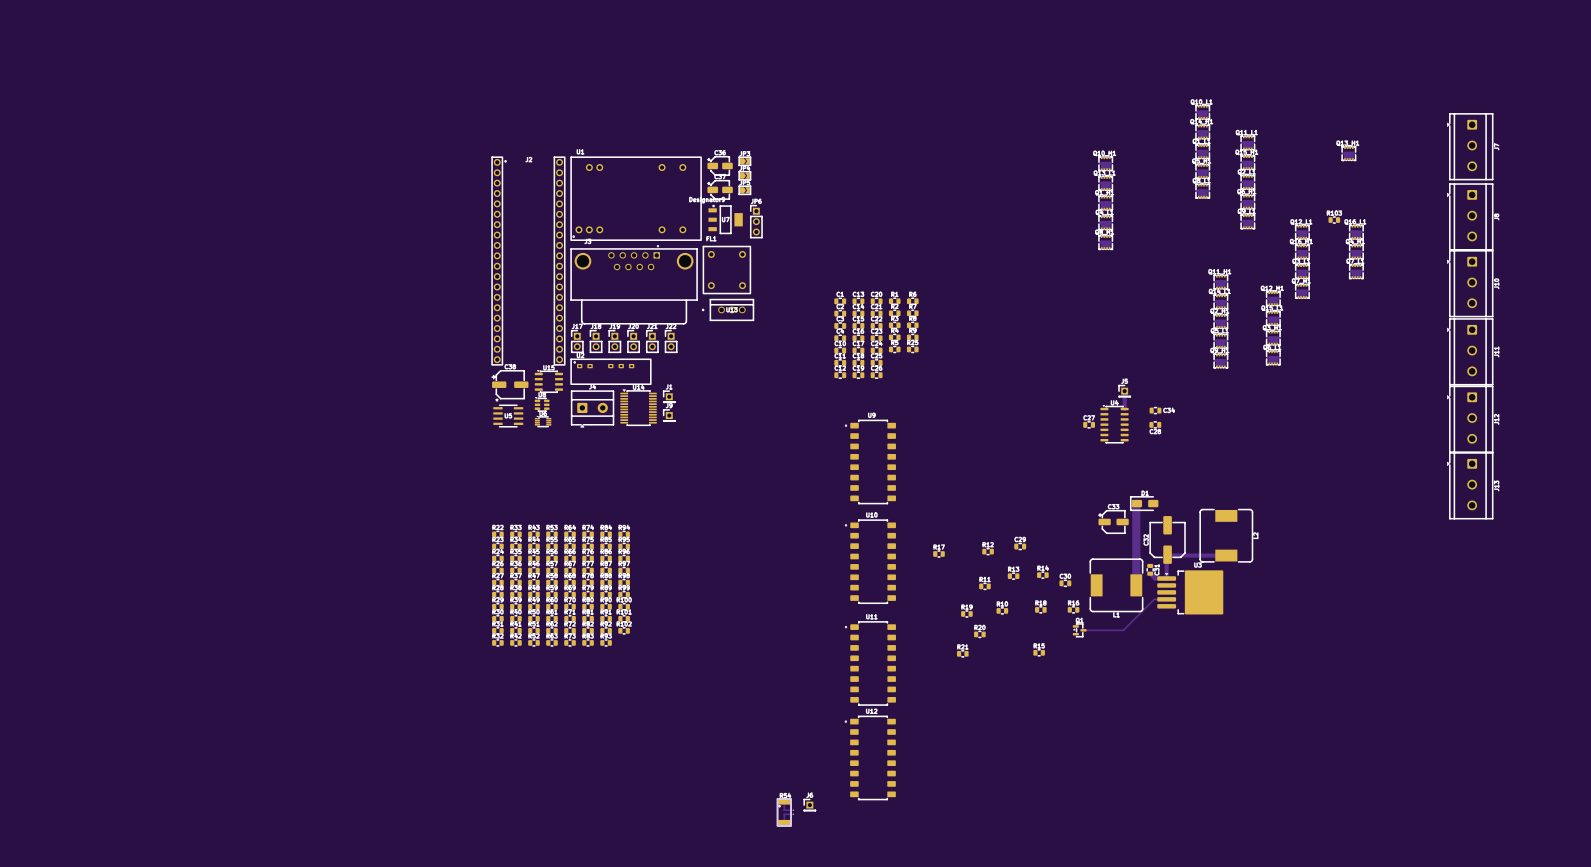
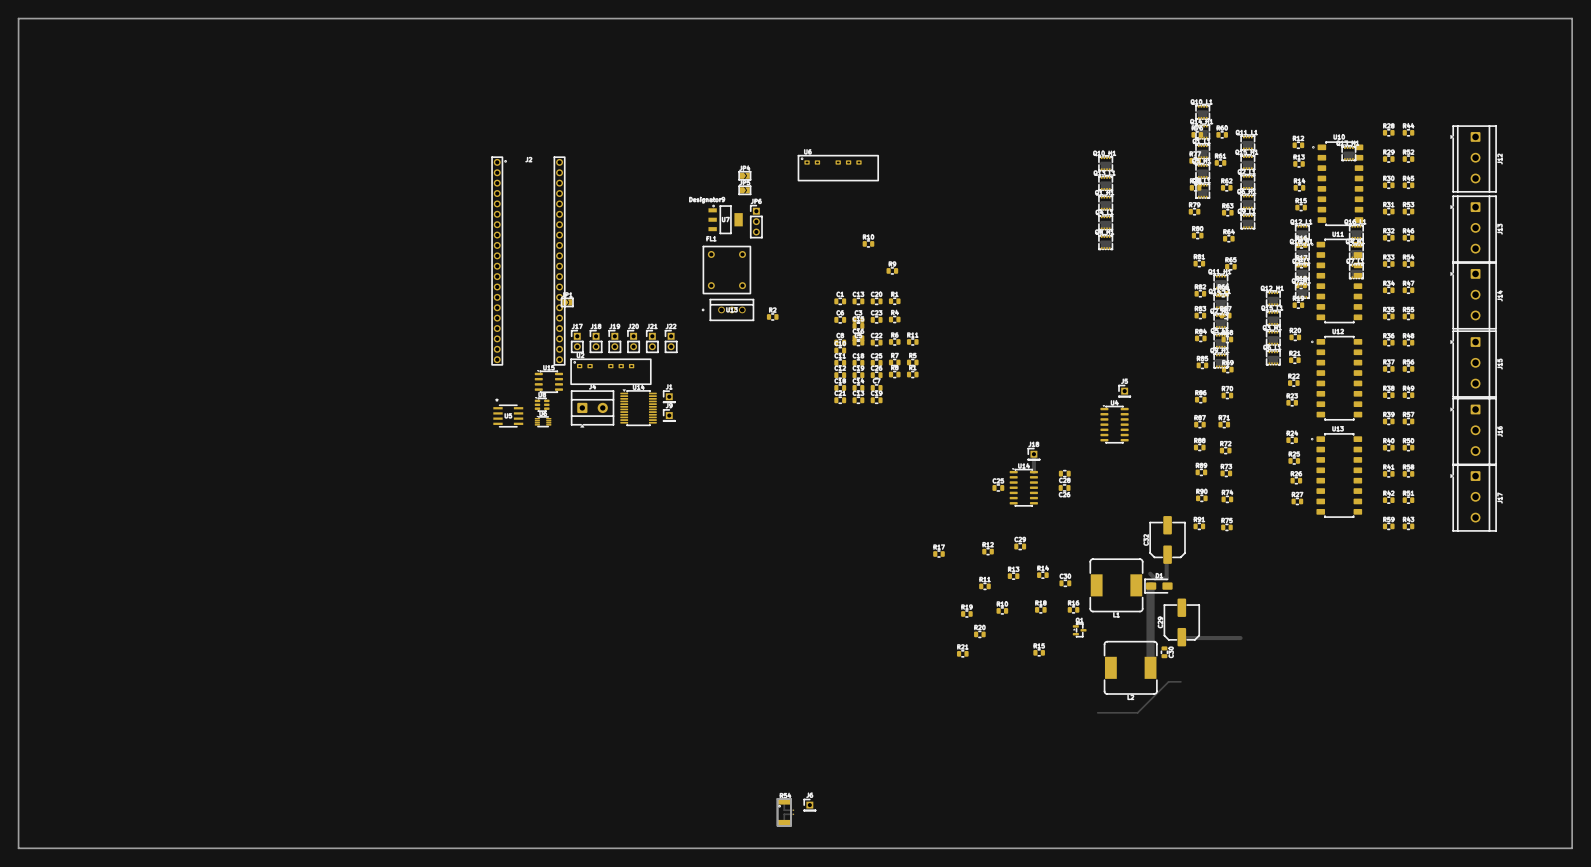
board edge: none -> (18, 18) (1572, 18) (1572, 848) (18, 848) (18, 18)
part: none -> (1298, 145)
part: (1470, 146) -> none
part: (744, 161) -> none
part: none -> (1299, 163)
part: (720, 165) -> none
part: none -> (838, 168)
part: none -> (1299, 187)
part: (720, 189) -> none
part: (636, 198) -> none
part: none -> (1301, 207)
part: (1470, 216) -> none
part: (1334, 220) -> none
part: none -> (868, 243)
part: none -> (1301, 244)
part: none -> (1408, 263)
part: none -> (1301, 264)
part: (1470, 283) -> none
part: (634, 284) -> none
part: none -> (1301, 285)
part: none -> (1473, 295)
part position: (912, 301) -> (894, 341)
part: none -> (567, 302)
part: none -> (1298, 305)
part: (840, 313) -> none
part position: (858, 313) -> (858, 387)
part position: (876, 313) -> (840, 400)
part position: (894, 313) -> (772, 316)
part position: (912, 313) -> (894, 362)
part: none -> (840, 319)
part position: (840, 325) -> (858, 319)
part position: (876, 325) -> (876, 342)
part: (894, 325) -> none
part position: (912, 325) -> (894, 374)
part position: (894, 337) -> (894, 319)
part position: (912, 337) -> (892, 270)
part: none -> (1295, 337)
part: (840, 338) -> none
part position: (876, 338) -> (876, 319)
part: none -> (912, 341)
part: none -> (840, 342)
part: none -> (858, 342)
part position: (894, 349) -> (912, 362)
part position: (912, 349) -> (1294, 460)
part: (858, 350) -> none
part: (876, 350) -> none
part: (1470, 351) -> none
part: none -> (1294, 360)
part: none -> (1473, 364)
part: none -> (912, 374)
part: (510, 384) -> none
part: none -> (840, 387)
part: none -> (876, 387)
track: (1124, 391) (1124, 409) -> none
part: none -> (858, 400)
part: none -> (876, 400)
part: (1155, 410) -> none
part position: (1470, 419) -> (1473, 158)
part: (1089, 424) -> none
part position: (1155, 424) -> (1064, 473)
part: none -> (1473, 431)
track: none -> (1033, 454) (1033, 472)
part: none -> (1033, 454)
part: (870, 462) -> none
part: none -> (1336, 475)
part position: (1470, 485) -> (1473, 229)
part: none -> (998, 487)
part: none -> (1023, 487)
part: none -> (1064, 487)
part: none -> (1473, 498)
track: (1136, 503) (1136, 585) -> (1151, 586) (1150, 667)
part position: (1144, 503) -> (1158, 586)
part: (1113, 521) -> none
part position: (497, 534) -> (1293, 383)
part position: (515, 534) -> (1388, 263)
part position: (533, 534) -> (1408, 526)
part position: (551, 534) -> (1408, 211)
part position: (570, 534) -> (1228, 238)
part position: (588, 534) -> (1227, 499)
part position: (606, 534) -> (1200, 338)
part: (624, 534) -> none
part rotation: 0° (1226, 535) -> 90° clockwise (1130, 667)
part position: (1226, 535) -> (1130, 667)
part position: (497, 546) -> (1292, 402)
part position: (515, 546) -> (1388, 290)
part position: (533, 546) -> (1408, 132)
part position: (551, 546) -> (1408, 316)
part position: (570, 546) -> (1230, 266)
part position: (588, 546) -> (1226, 527)
part position: (606, 546) -> (1202, 365)
part: (624, 546) -> none
track: (1167, 554) (1226, 555) -> (1181, 637) (1240, 638)
part position: (497, 558) -> (1292, 440)
part position: (515, 558) -> (1388, 316)
part position: (533, 558) -> (1408, 185)
part position: (551, 558) -> (1408, 368)
part position: (570, 558) -> (1223, 293)
part position: (588, 558) -> (1197, 134)
part position: (606, 558) -> (1200, 399)
part: (624, 558) -> none
part position: (870, 561) -> (1337, 183)
part: (1150, 569) -> none
part position: (497, 570) -> (1296, 480)
part position: (515, 570) -> (1388, 342)
part position: (533, 570) -> (1408, 237)
part position: (551, 570) -> (1408, 421)
part position: (570, 570) -> (1225, 315)
part position: (588, 570) -> (1195, 160)
part position: (606, 570) -> (1199, 424)
part: (624, 570) -> none
part position: (497, 582) -> (1297, 501)
part position: (515, 582) -> (1388, 368)
part position: (533, 582) -> (1408, 290)
part position: (551, 582) -> (1408, 473)
part position: (570, 582) -> (1227, 339)
part position: (588, 582) -> (1195, 187)
part position: (606, 582) -> (1199, 447)
part: (624, 582) -> none
part: (1190, 592) -> none
part position: (497, 594) -> (1388, 132)
part position: (515, 594) -> (1388, 395)
part position: (533, 594) -> (1408, 342)
part position: (551, 594) -> (1388, 526)
part position: (570, 594) -> (1227, 369)
part position: (588, 594) -> (1194, 211)
part position: (606, 594) -> (1201, 472)
part: (624, 594) -> none
track: (1166, 599) (1154, 599) (1123, 630) (1083, 630) -> (1180, 681) (1168, 681) (1137, 712) (1097, 712)
part position: (497, 606) -> (1388, 159)
part position: (515, 606) -> (1388, 421)
part position: (533, 606) -> (1408, 395)
part position: (551, 606) -> (1222, 134)
part position: (570, 606) -> (1227, 395)
part position: (588, 606) -> (1197, 235)
part position: (606, 606) -> (1201, 498)
part: (624, 606) -> none
part position: (497, 618) -> (1388, 185)
part position: (515, 618) -> (1388, 447)
part position: (533, 618) -> (1408, 447)
part position: (551, 618) -> (1220, 162)
part position: (570, 618) -> (1224, 424)
part position: (588, 618) -> (1199, 263)
part position: (606, 618) -> (1199, 526)
part: (624, 618) -> none
part: none -> (1181, 622)
part position: (497, 630) -> (1388, 211)
part position: (515, 630) -> (1388, 473)
part position: (533, 630) -> (1408, 500)
part position: (551, 630) -> (1226, 187)
part position: (570, 630) -> (1225, 450)
part position: (588, 630) -> (1200, 293)
part: (606, 630) -> none
part: (624, 630) -> none
part position: (497, 642) -> (1388, 237)
part position: (515, 642) -> (1388, 500)
part position: (533, 642) -> (1408, 159)
part position: (551, 642) -> (1227, 212)
part position: (570, 642) -> (1226, 473)
part position: (588, 642) -> (1200, 315)
part: (606, 642) -> none
part: none -> (1164, 652)
part position: (870, 663) -> (1336, 280)
part position: (870, 757) -> (1336, 378)

